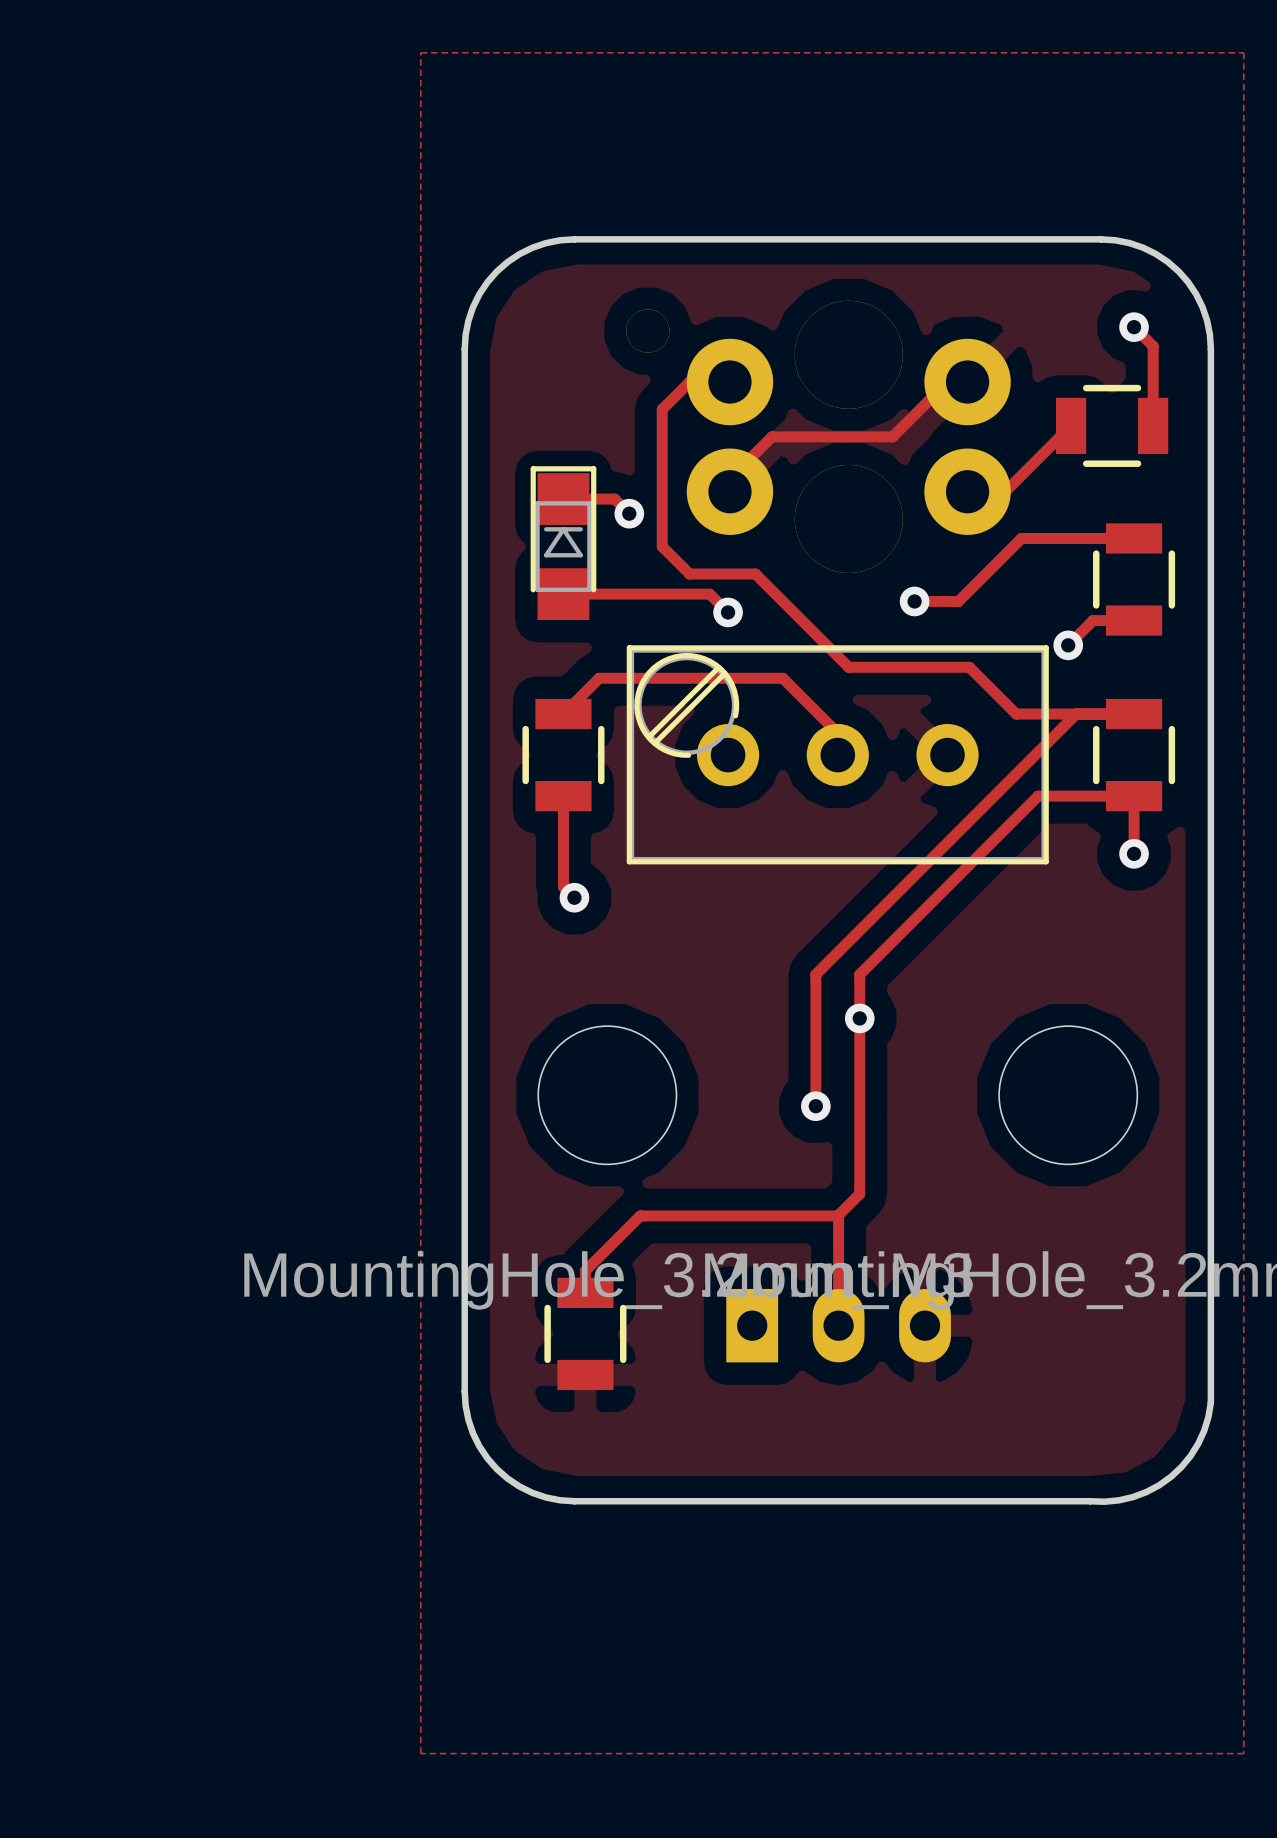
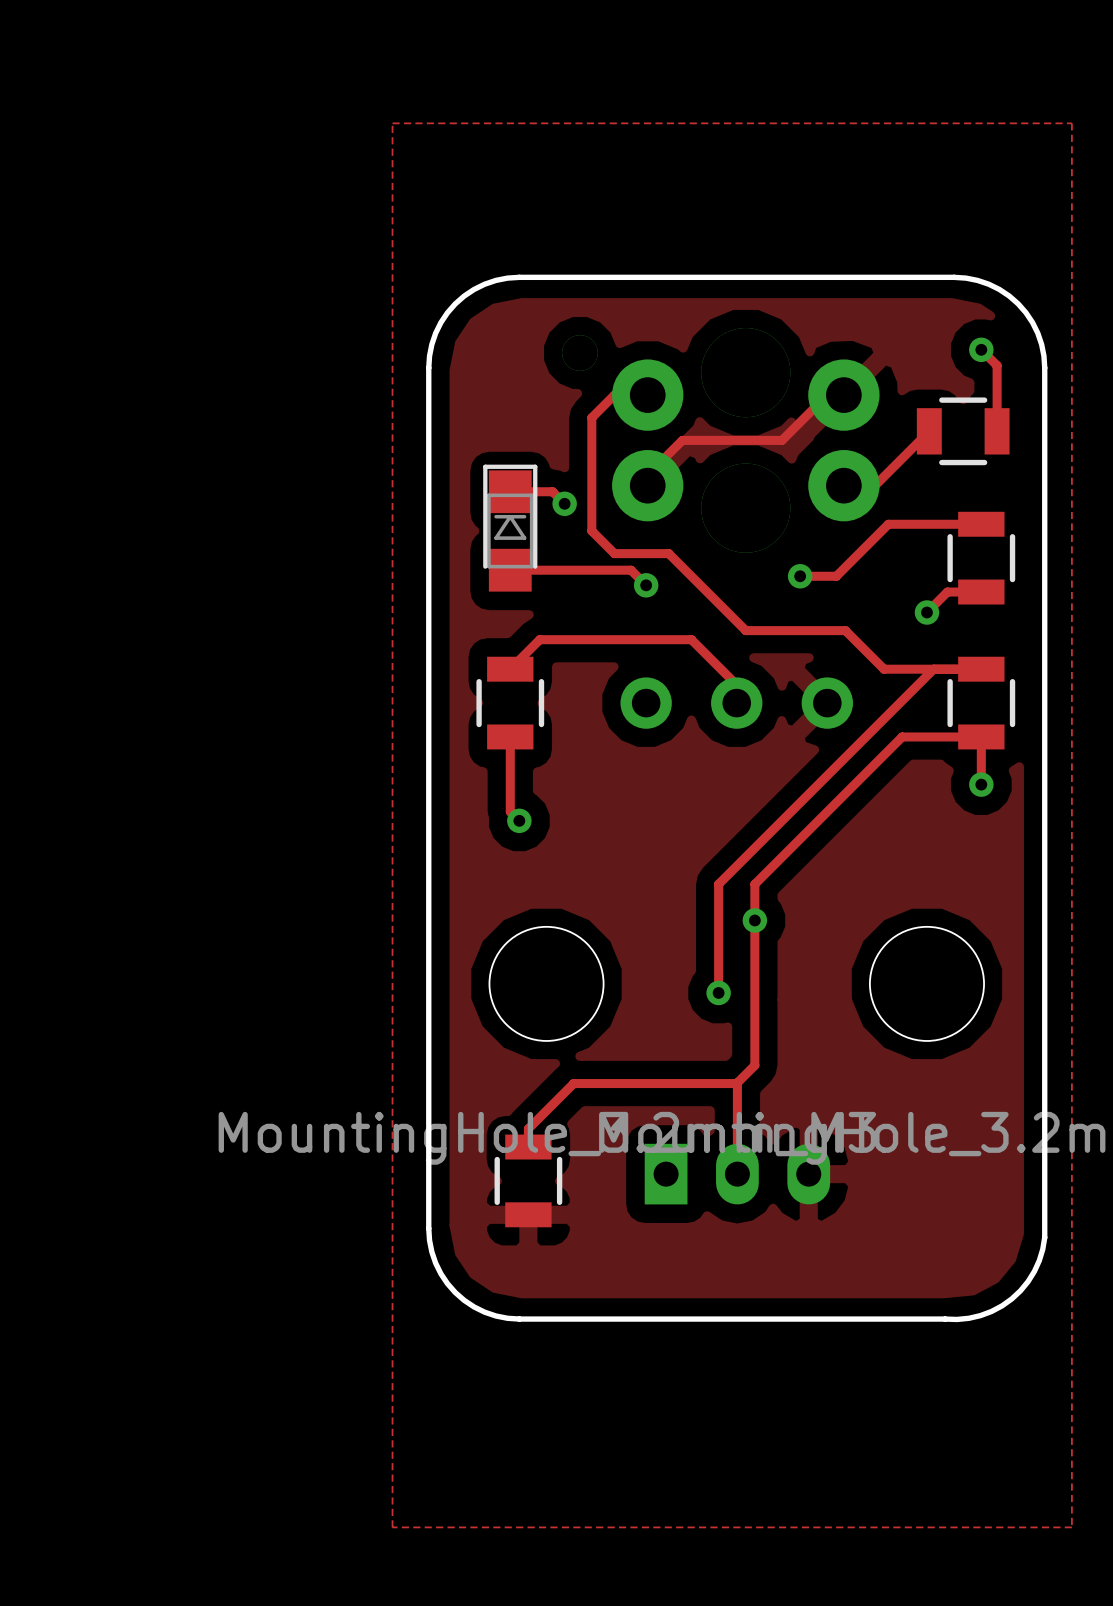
part footprint: [626, 645, 1049, 865] -> [620, 677, 854, 729]

